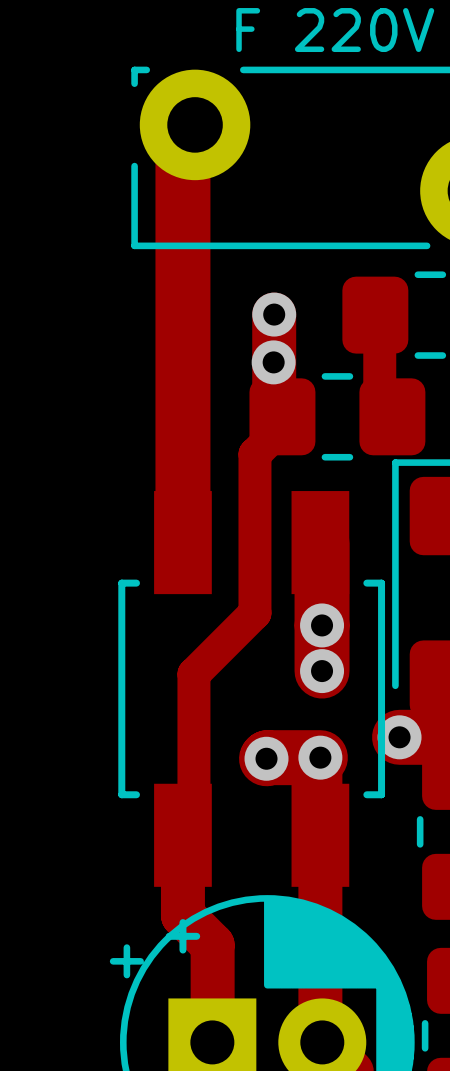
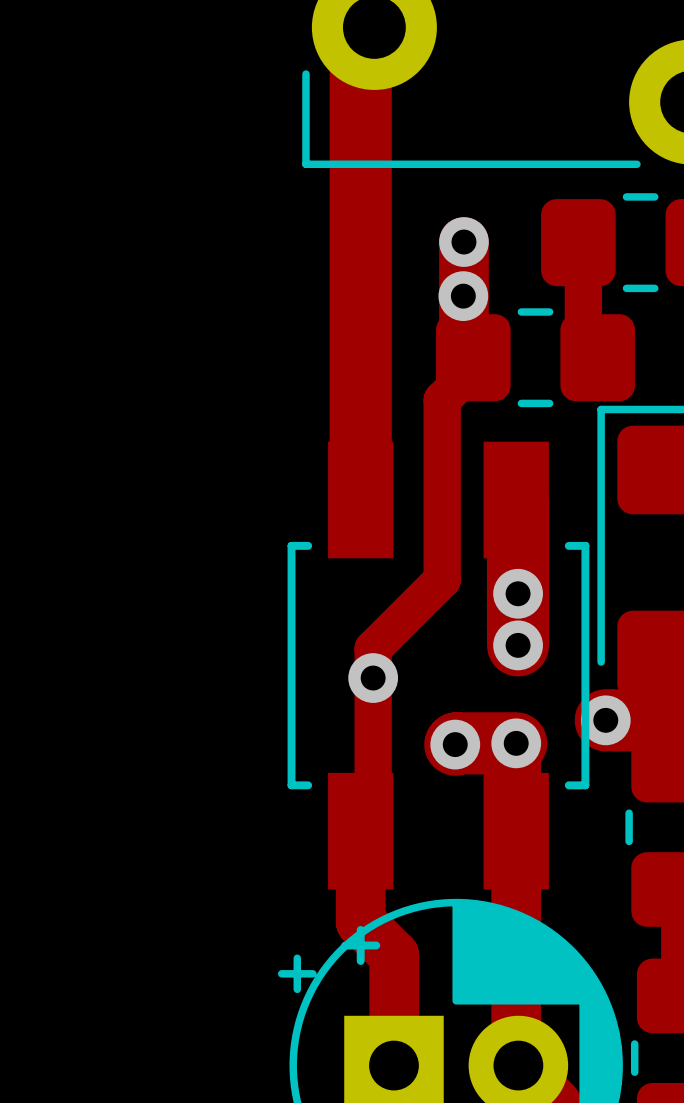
via: none -> (373, 678)

